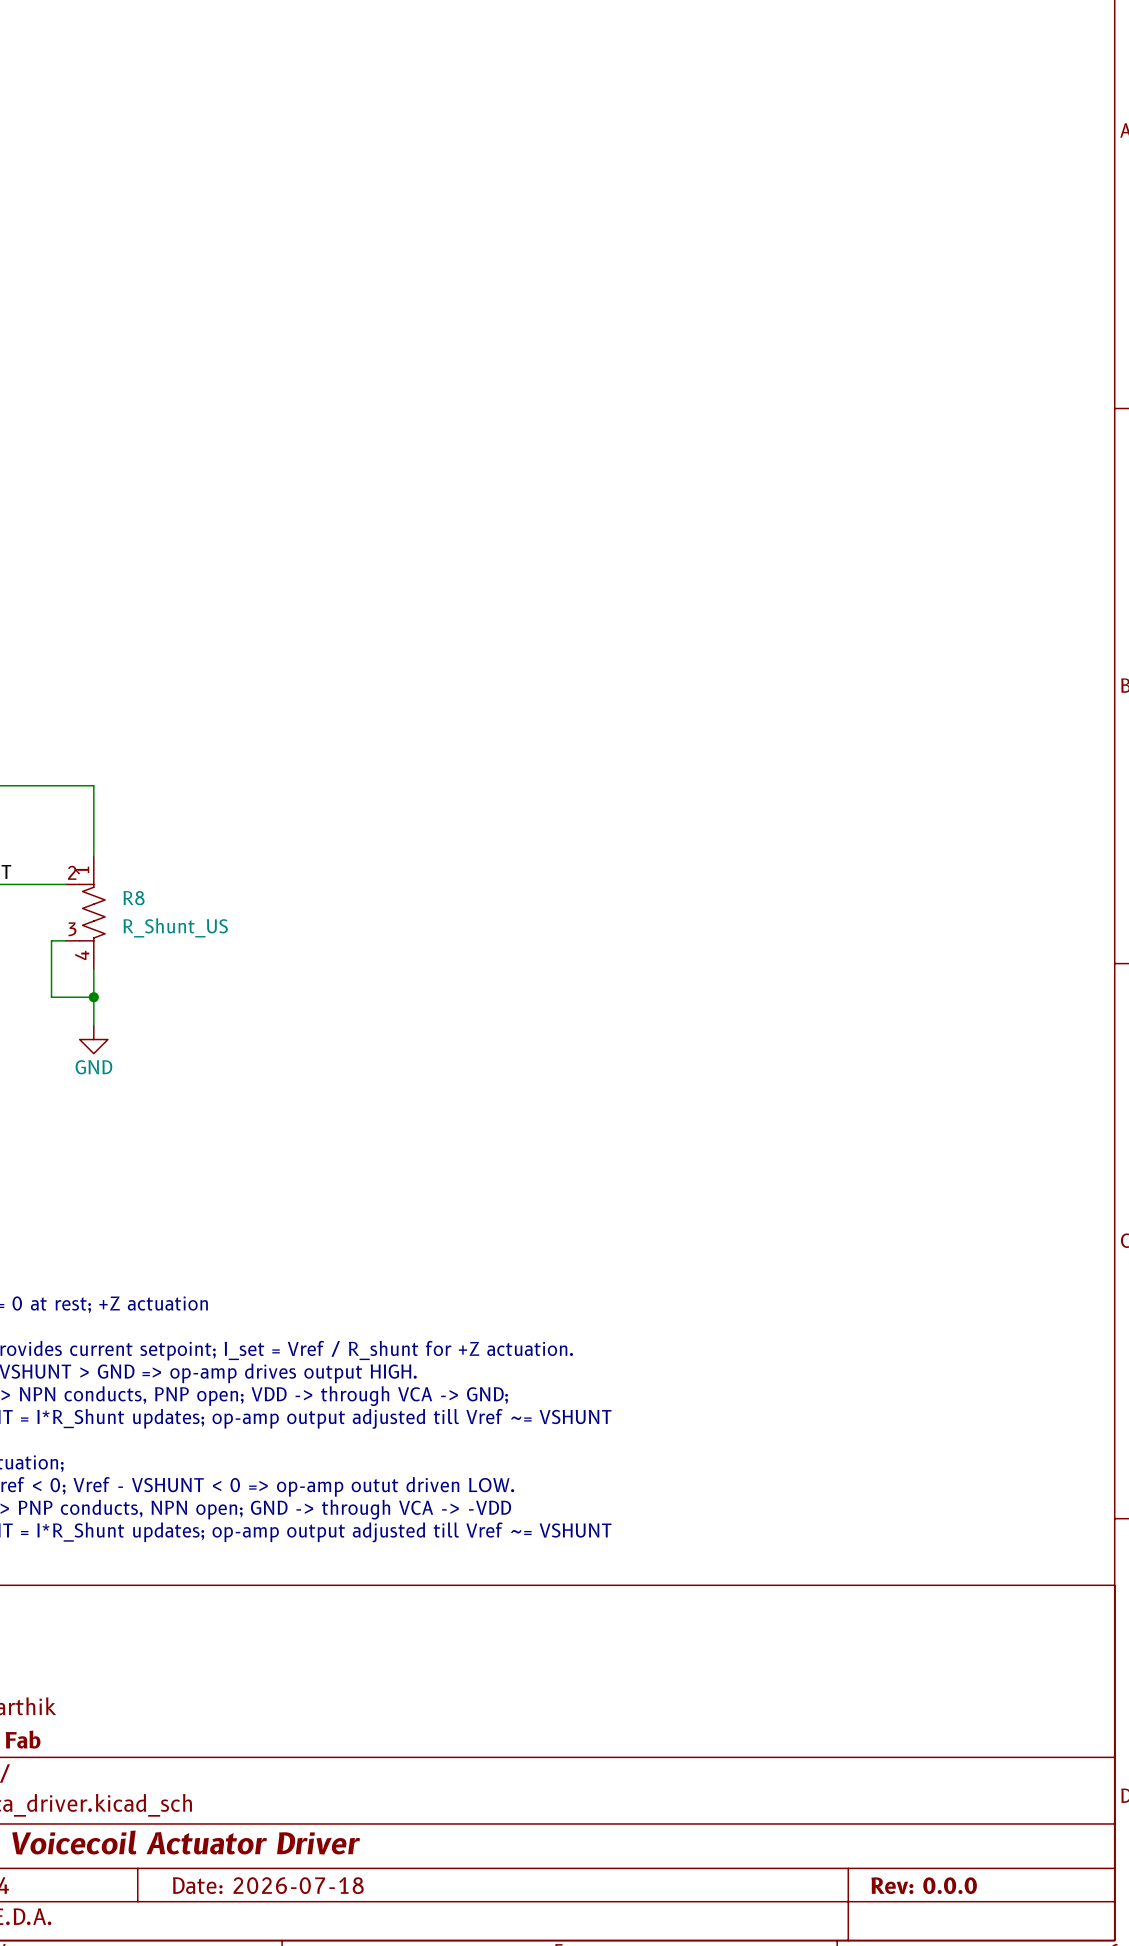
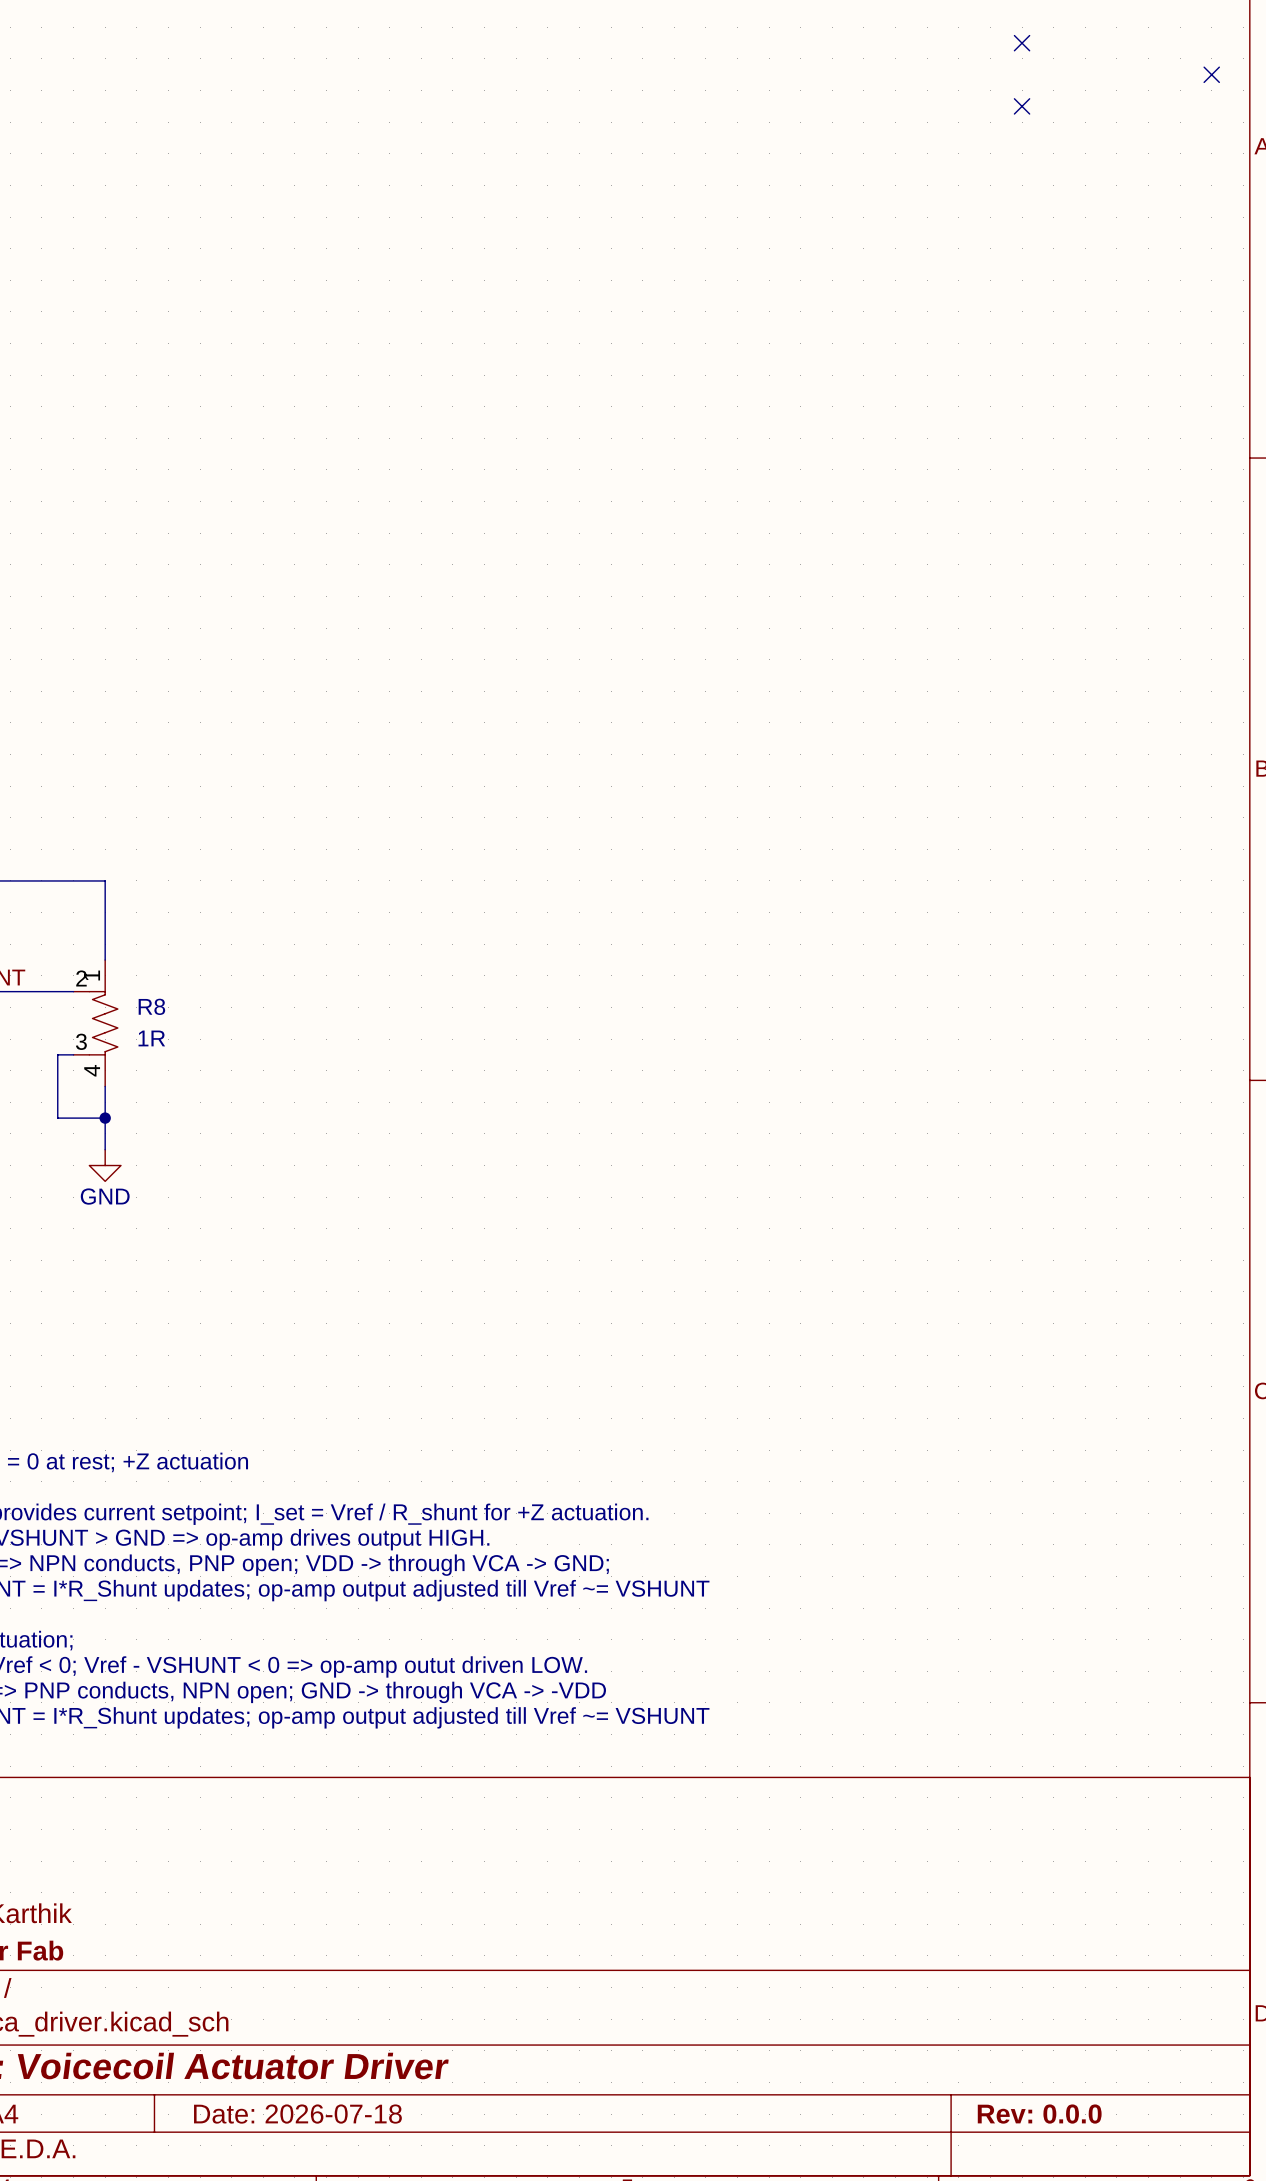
no-connect mark: none -> (1022, 43)
no-connect mark: none -> (1211, 74)
no-connect mark: none -> (1022, 106)
R8 value: R_Shunt_US (175, 927) -> 1R (151, 1038)

